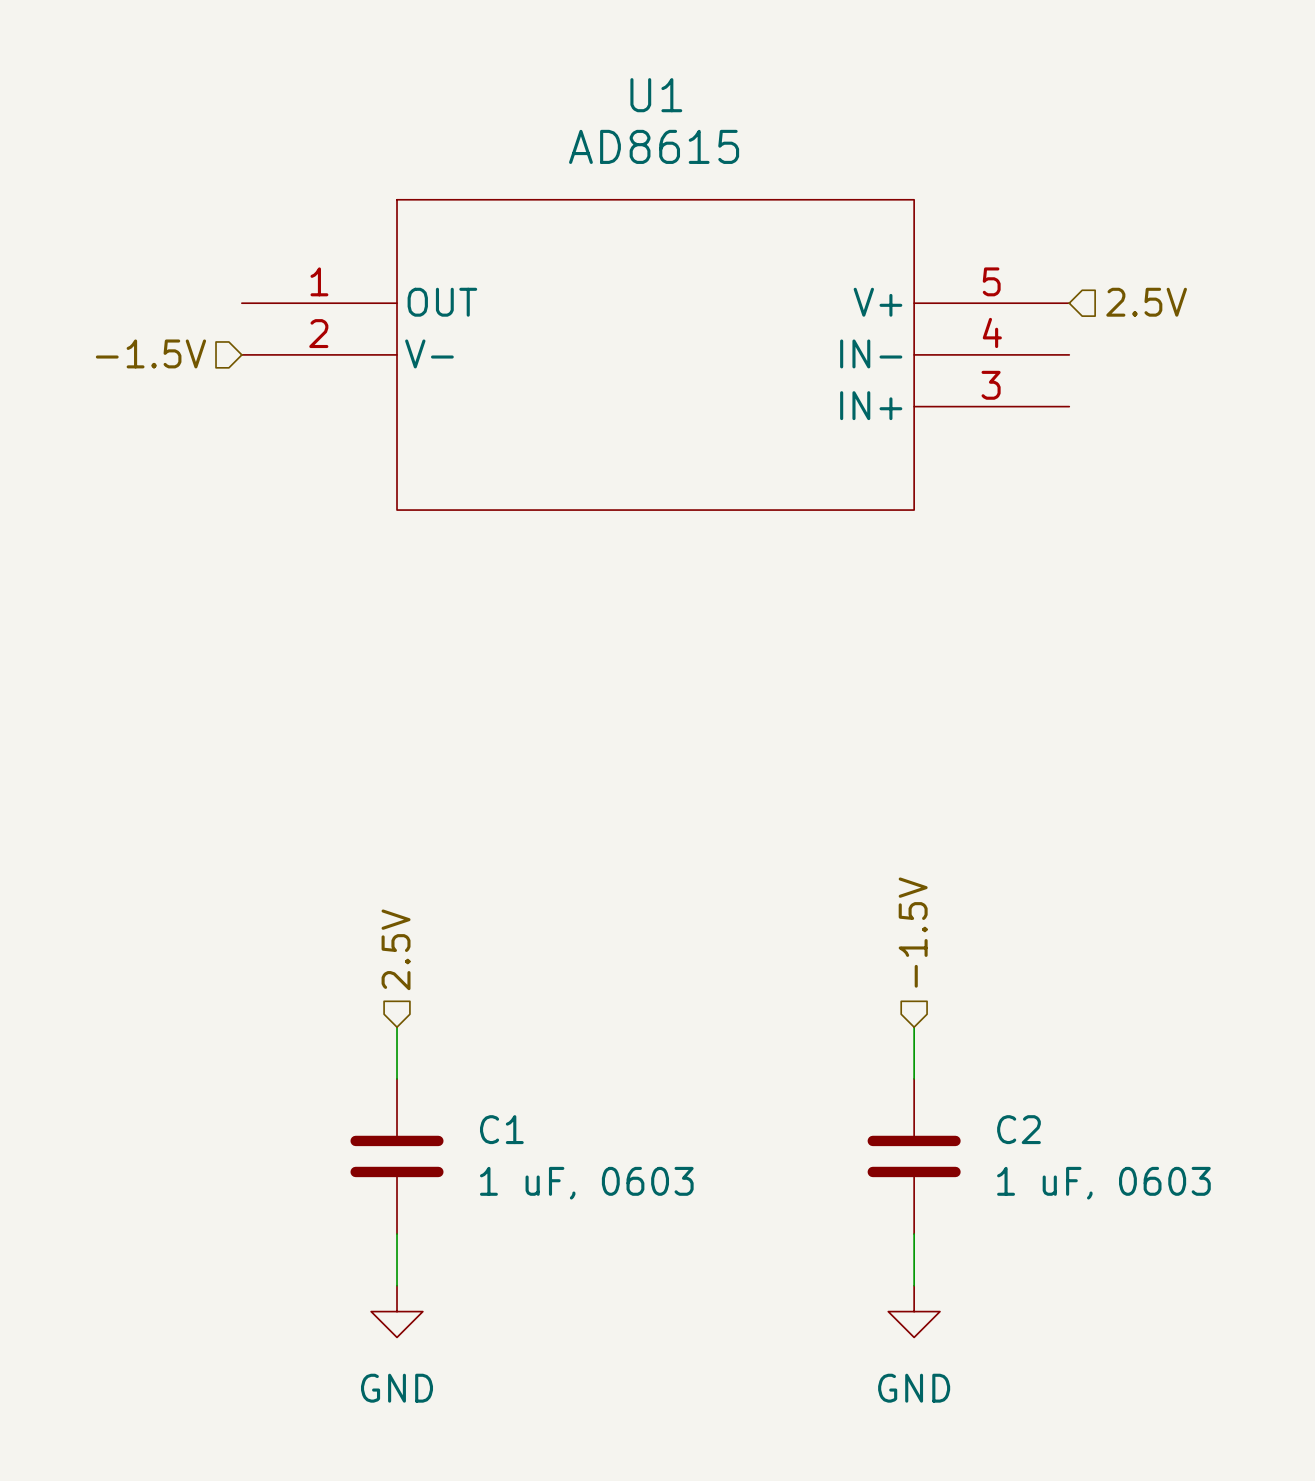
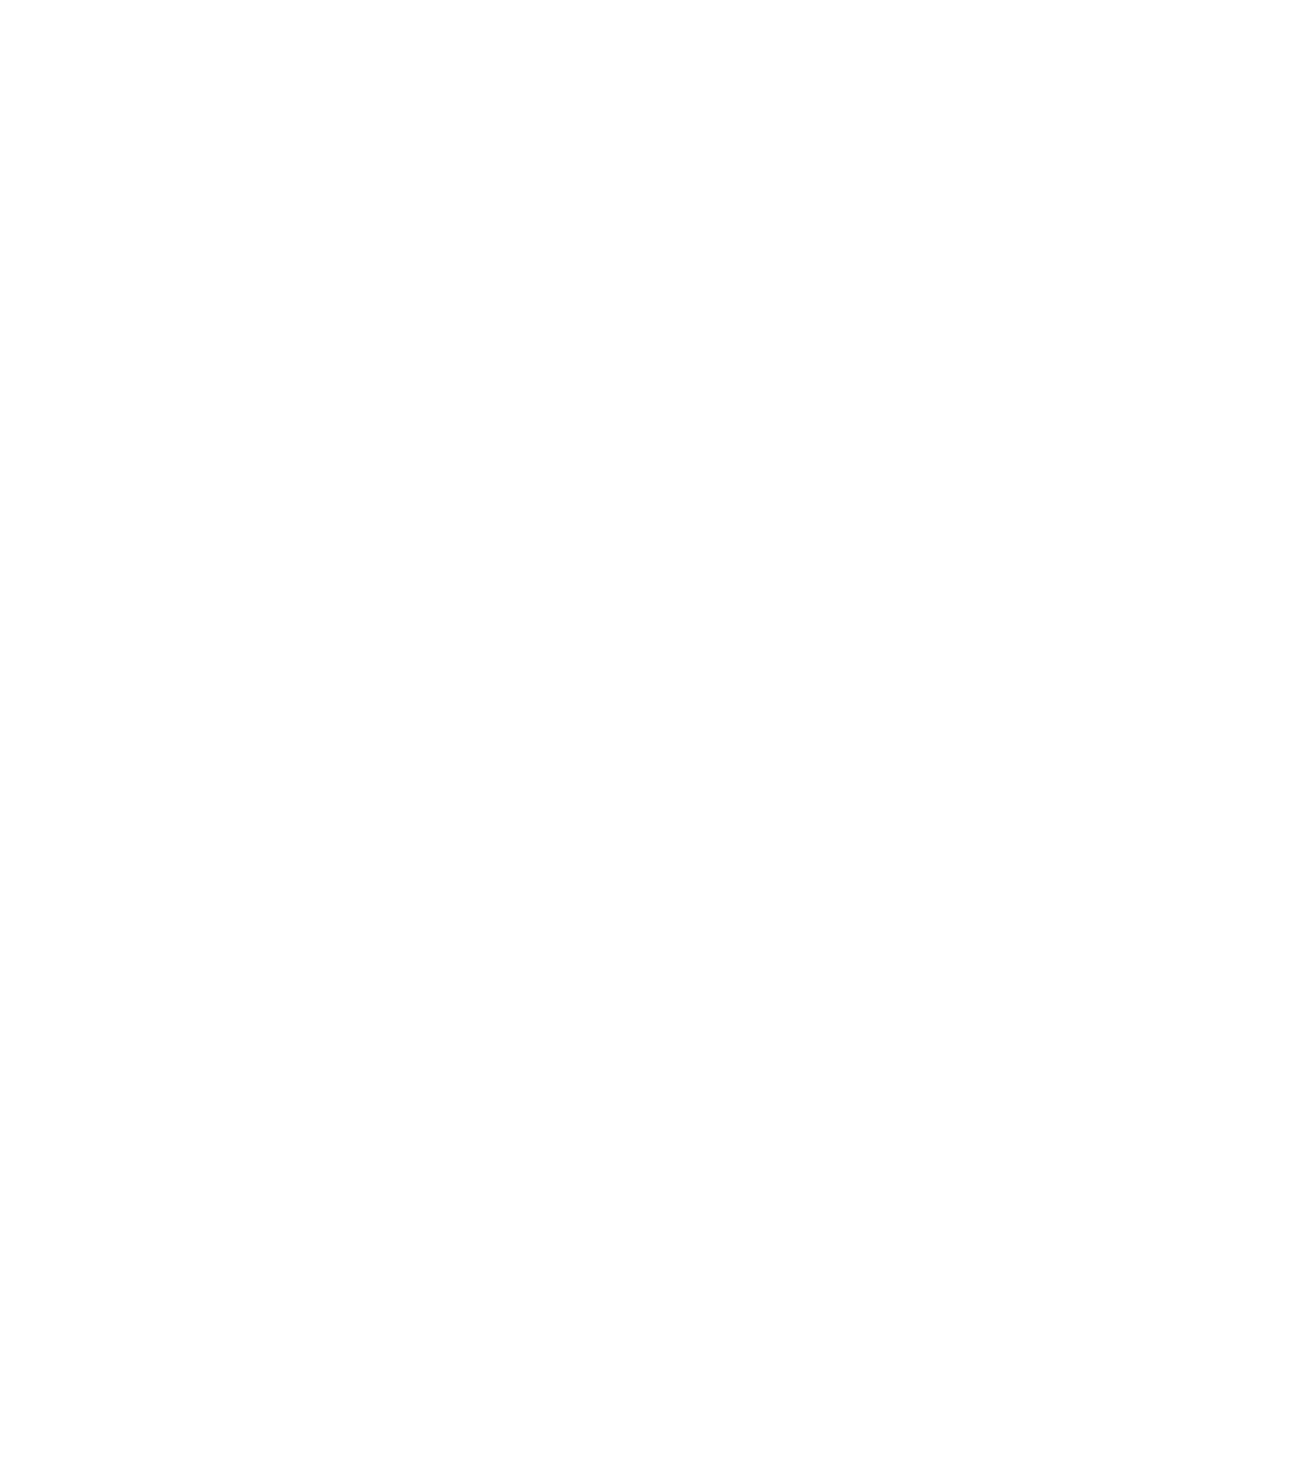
hierarchical label: 2.5V (1146, 302) -> none
hierarchical label: -1.5V (150, 353) -> none
U1: AD8615 (655, 354) -> none
hierarchical label: -1.5V (913, 932) -> none
hierarchical label: 2.5V (396, 949) -> none
wire: (397, 1027) (397, 1078) -> none
wire: (914, 1027) (914, 1078) -> none
C1: 1 uF, 0603 (397, 1156) -> none
C2: 1 uF, 0603 (914, 1156) -> none
wire: (397, 1234) (397, 1285) -> none
wire: (914, 1234) (914, 1285) -> none
power symbol: GND (397, 1311) -> none
power symbol: GND (914, 1311) -> none

